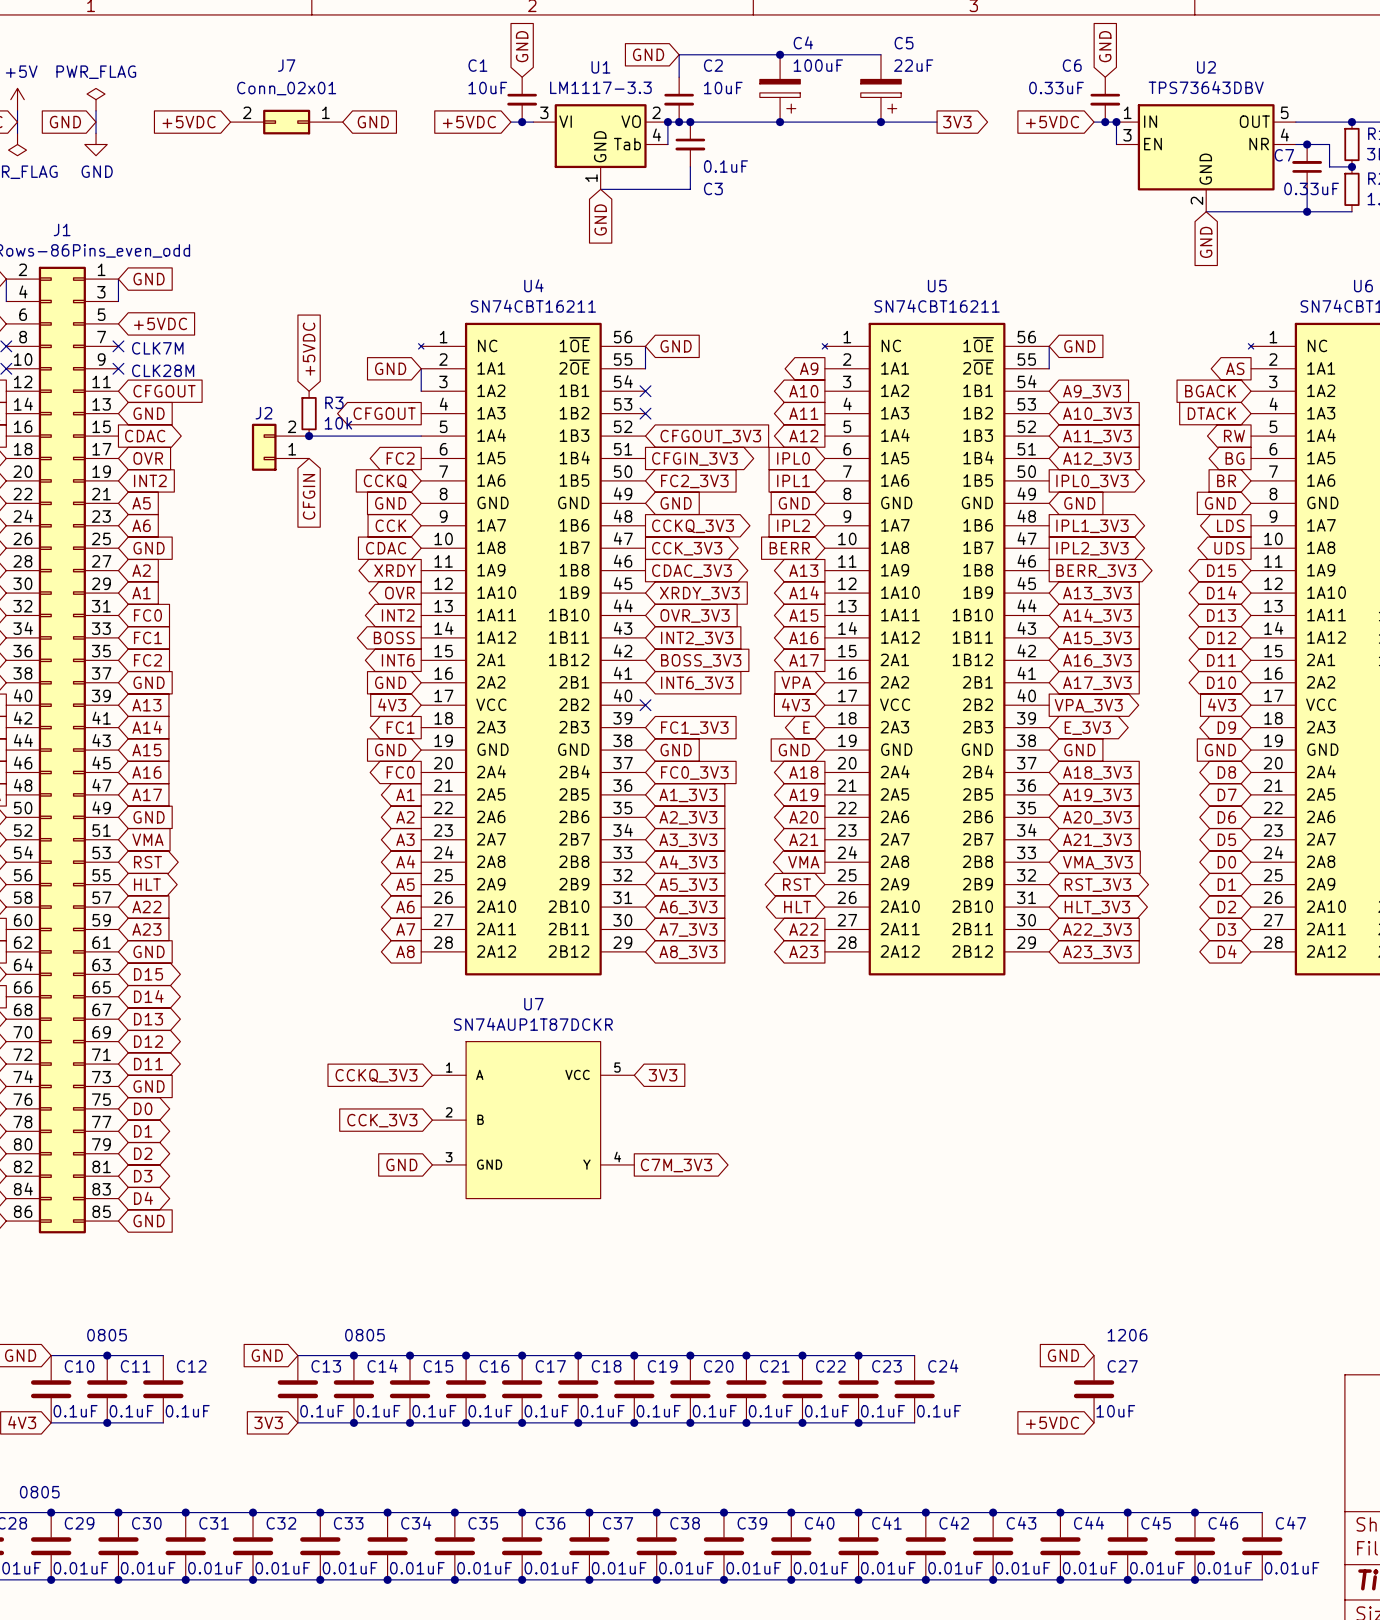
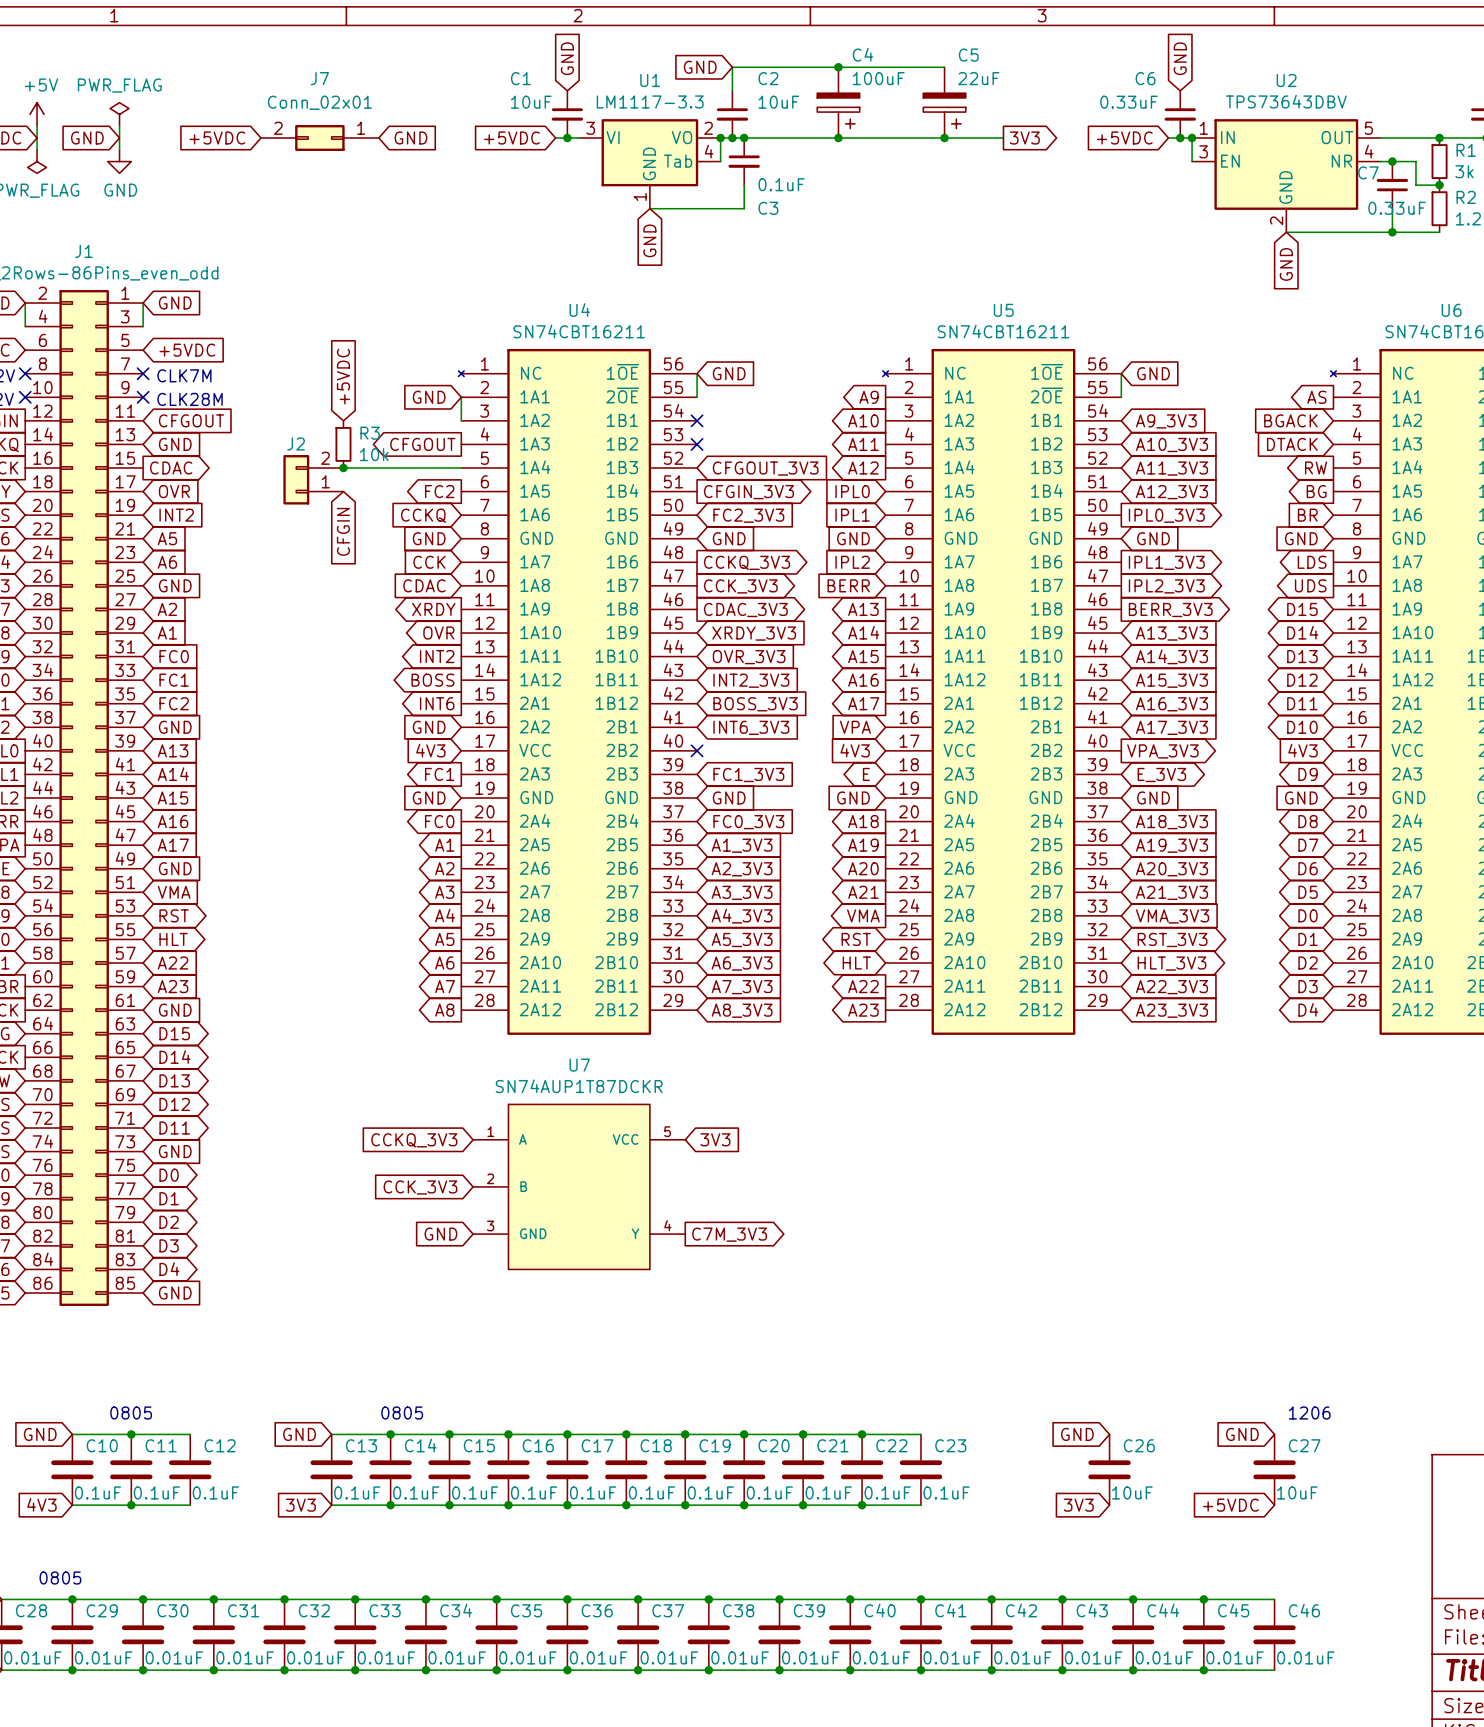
text position: 1206 (1127, 1335) -> 1206 (1309, 1413)
wire: (858, 1355) (914, 1355) -> none
junction: (858, 1355) -> none
global label position: GND (1063, 1355) -> GND (1077, 1434)
global label: none -> GND (1242, 1434)
C24: 0.1uF (914, 1389) -> none
C26: none -> 10uF (1109, 1469)
C27 position: (1094, 1389) -> (1274, 1469)
wire: (858, 1422) (914, 1422) -> none
junction: (858, 1422) -> none
global label: none -> 3V3 (1078, 1505)
global label position: +5VDC (1052, 1422) -> +5VDC (1230, 1505)
wire: (1194, 1512) (1262, 1512) -> none
junction: (1194, 1512) -> none
C47: 0.01uF (1262, 1546) -> none
wire: (1194, 1579) (1262, 1579) -> none
junction: (1194, 1579) -> none

